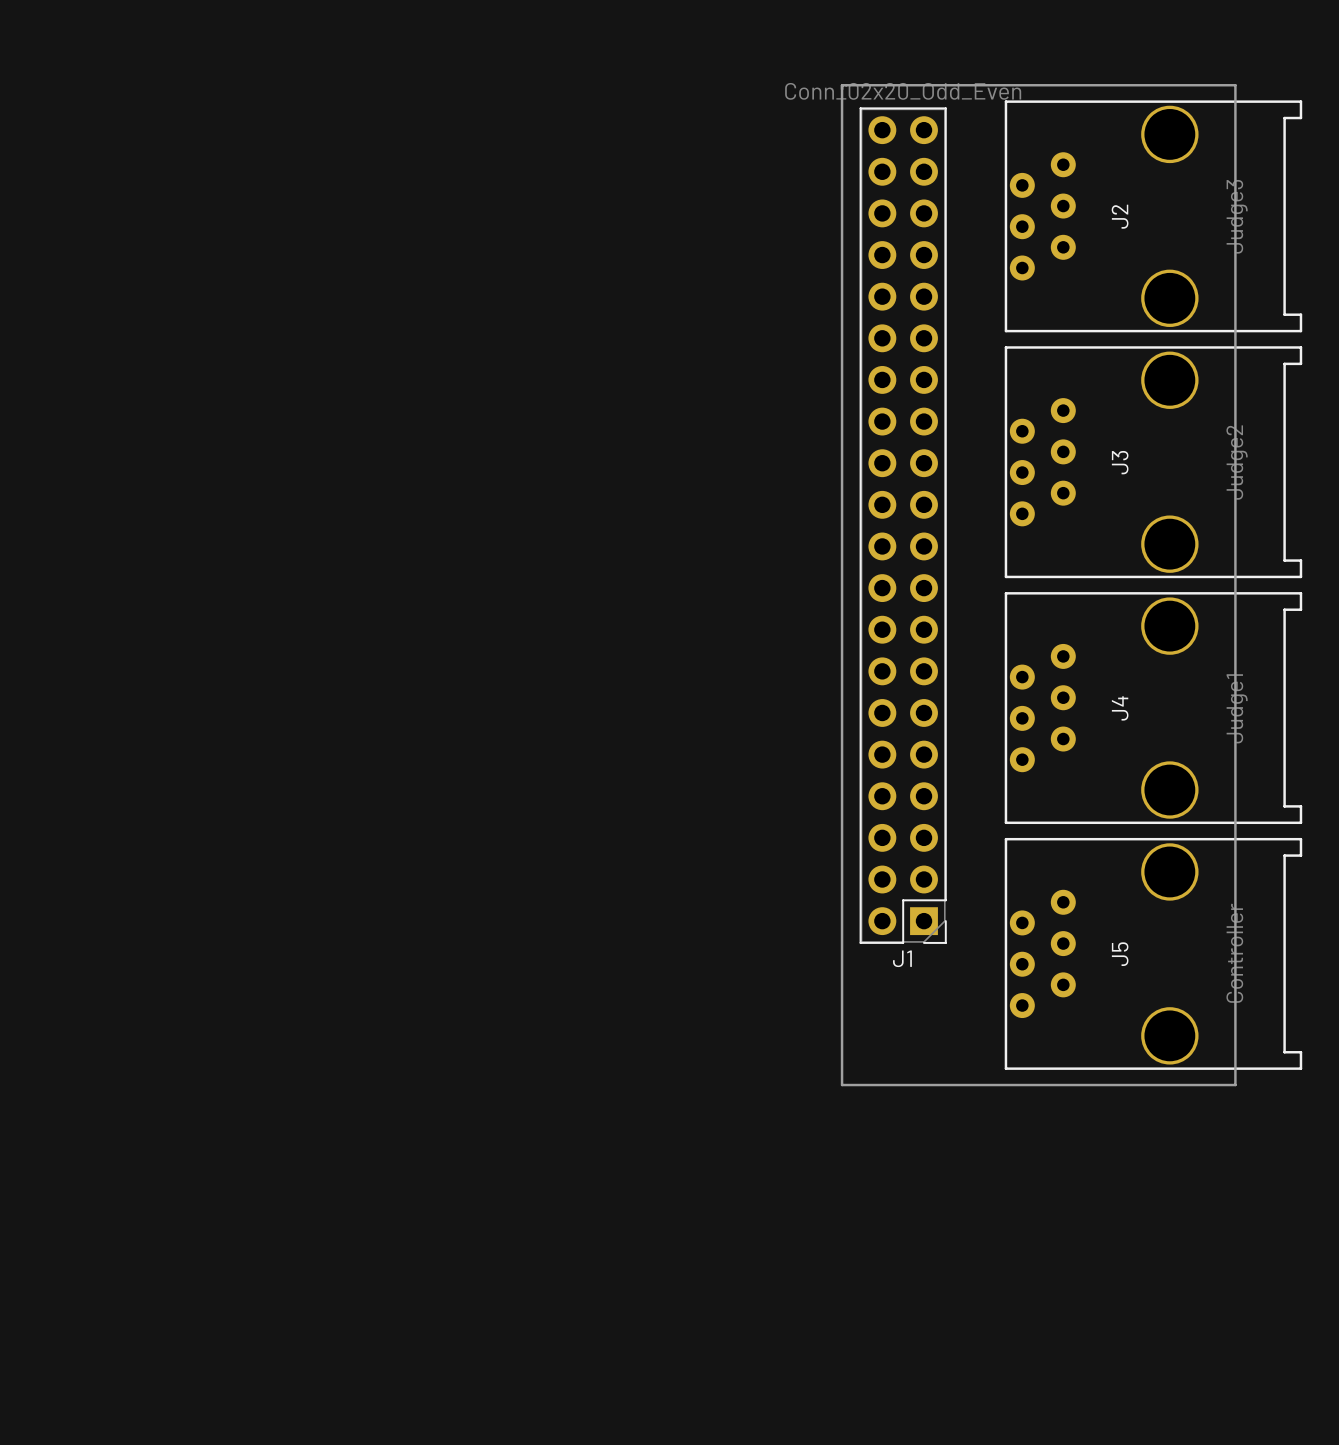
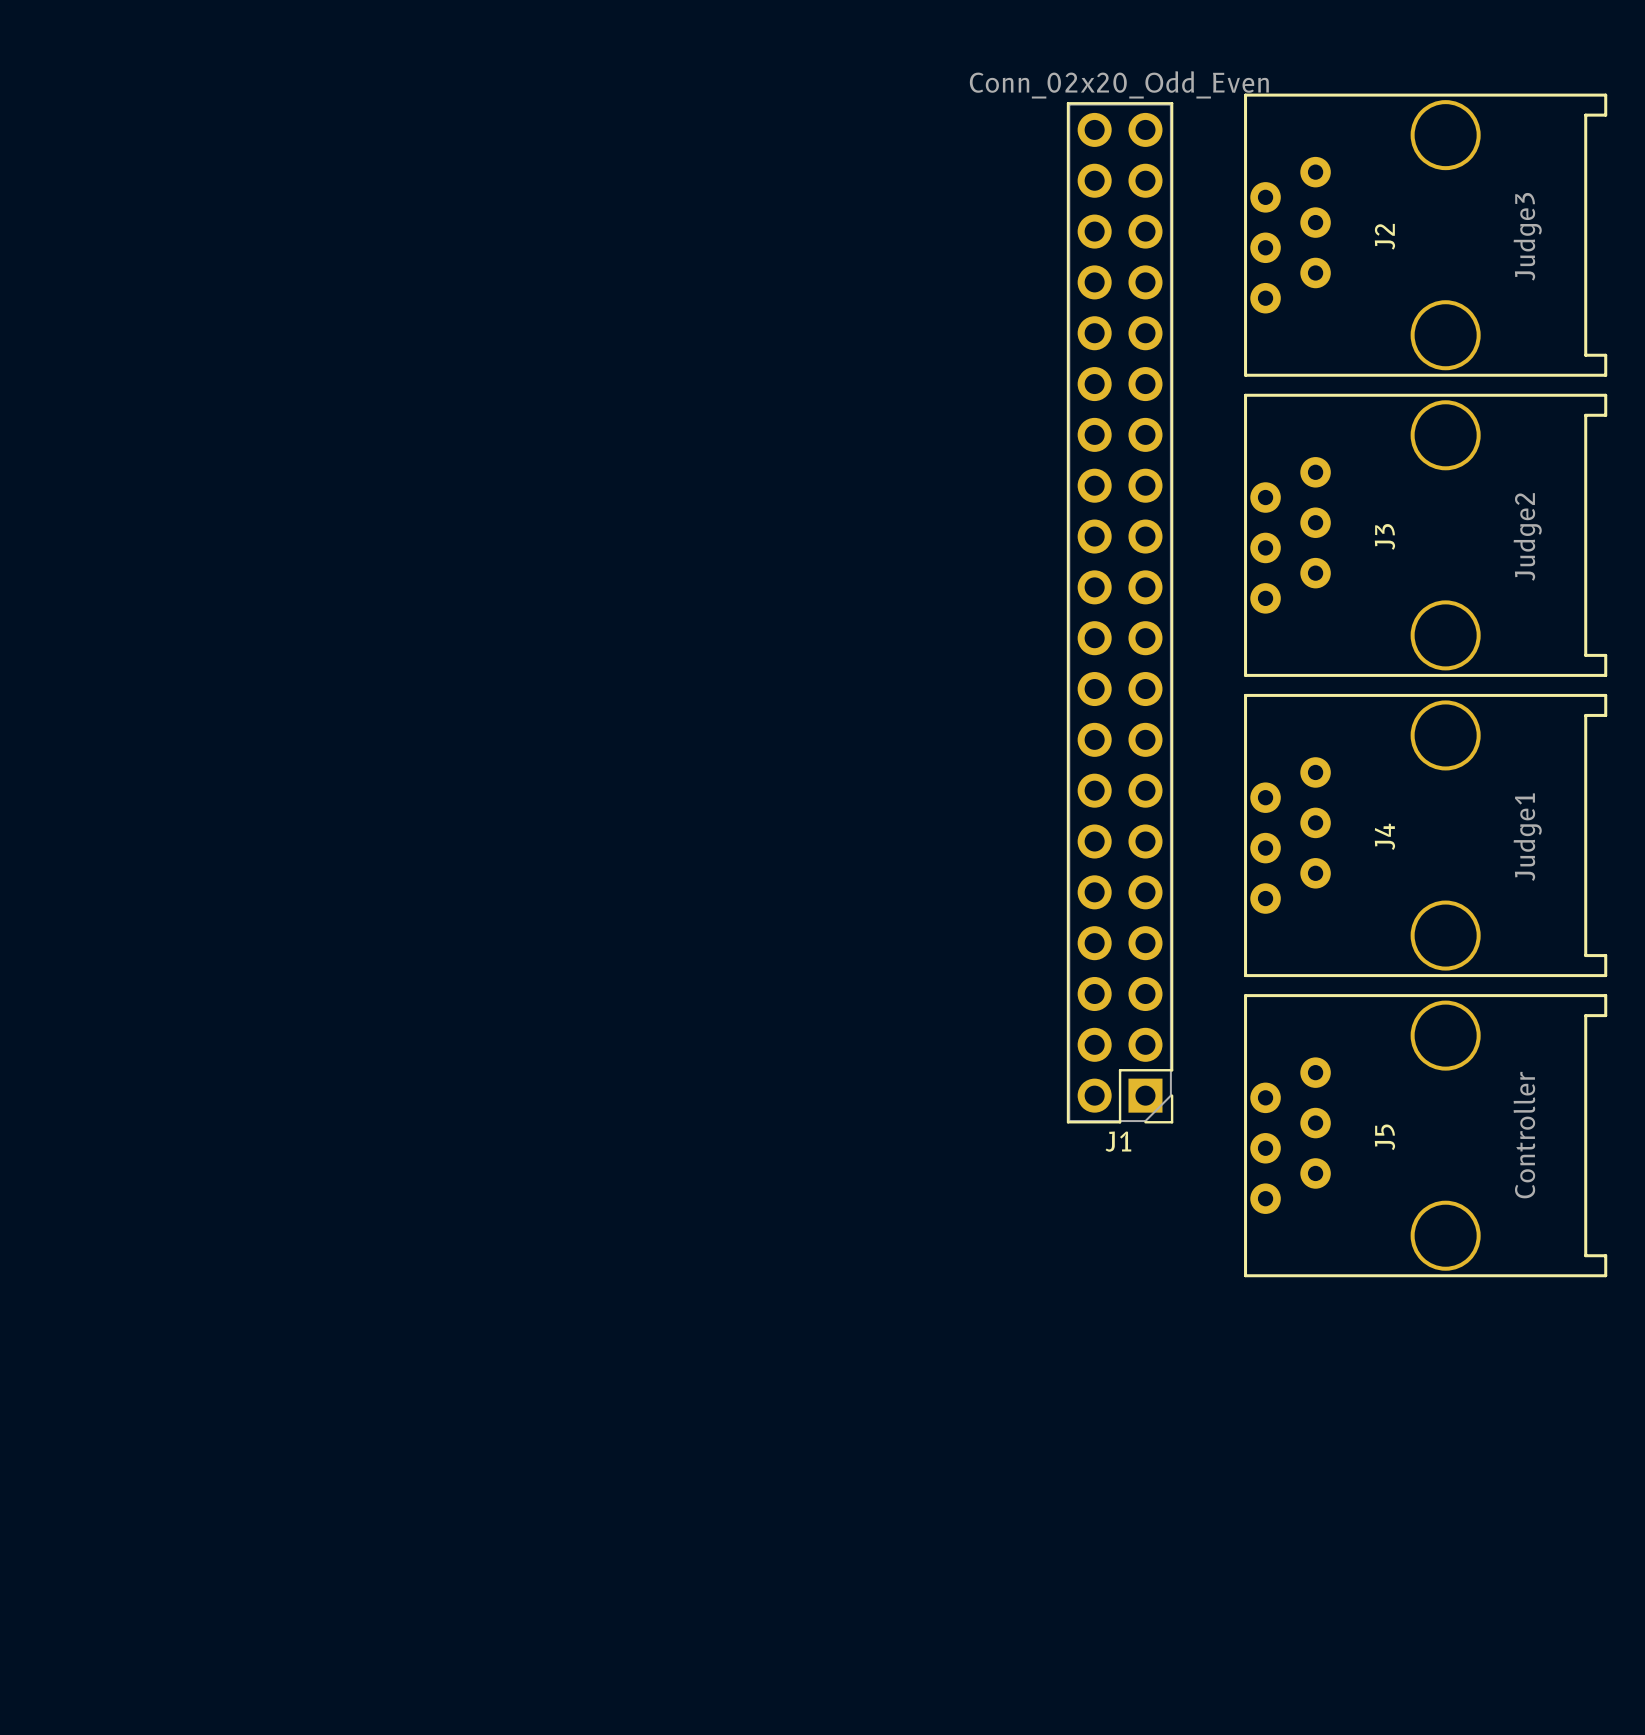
board edge: (842, 85) (1235, 85) (1235, 1085) (842, 1085) (842, 85) -> none

